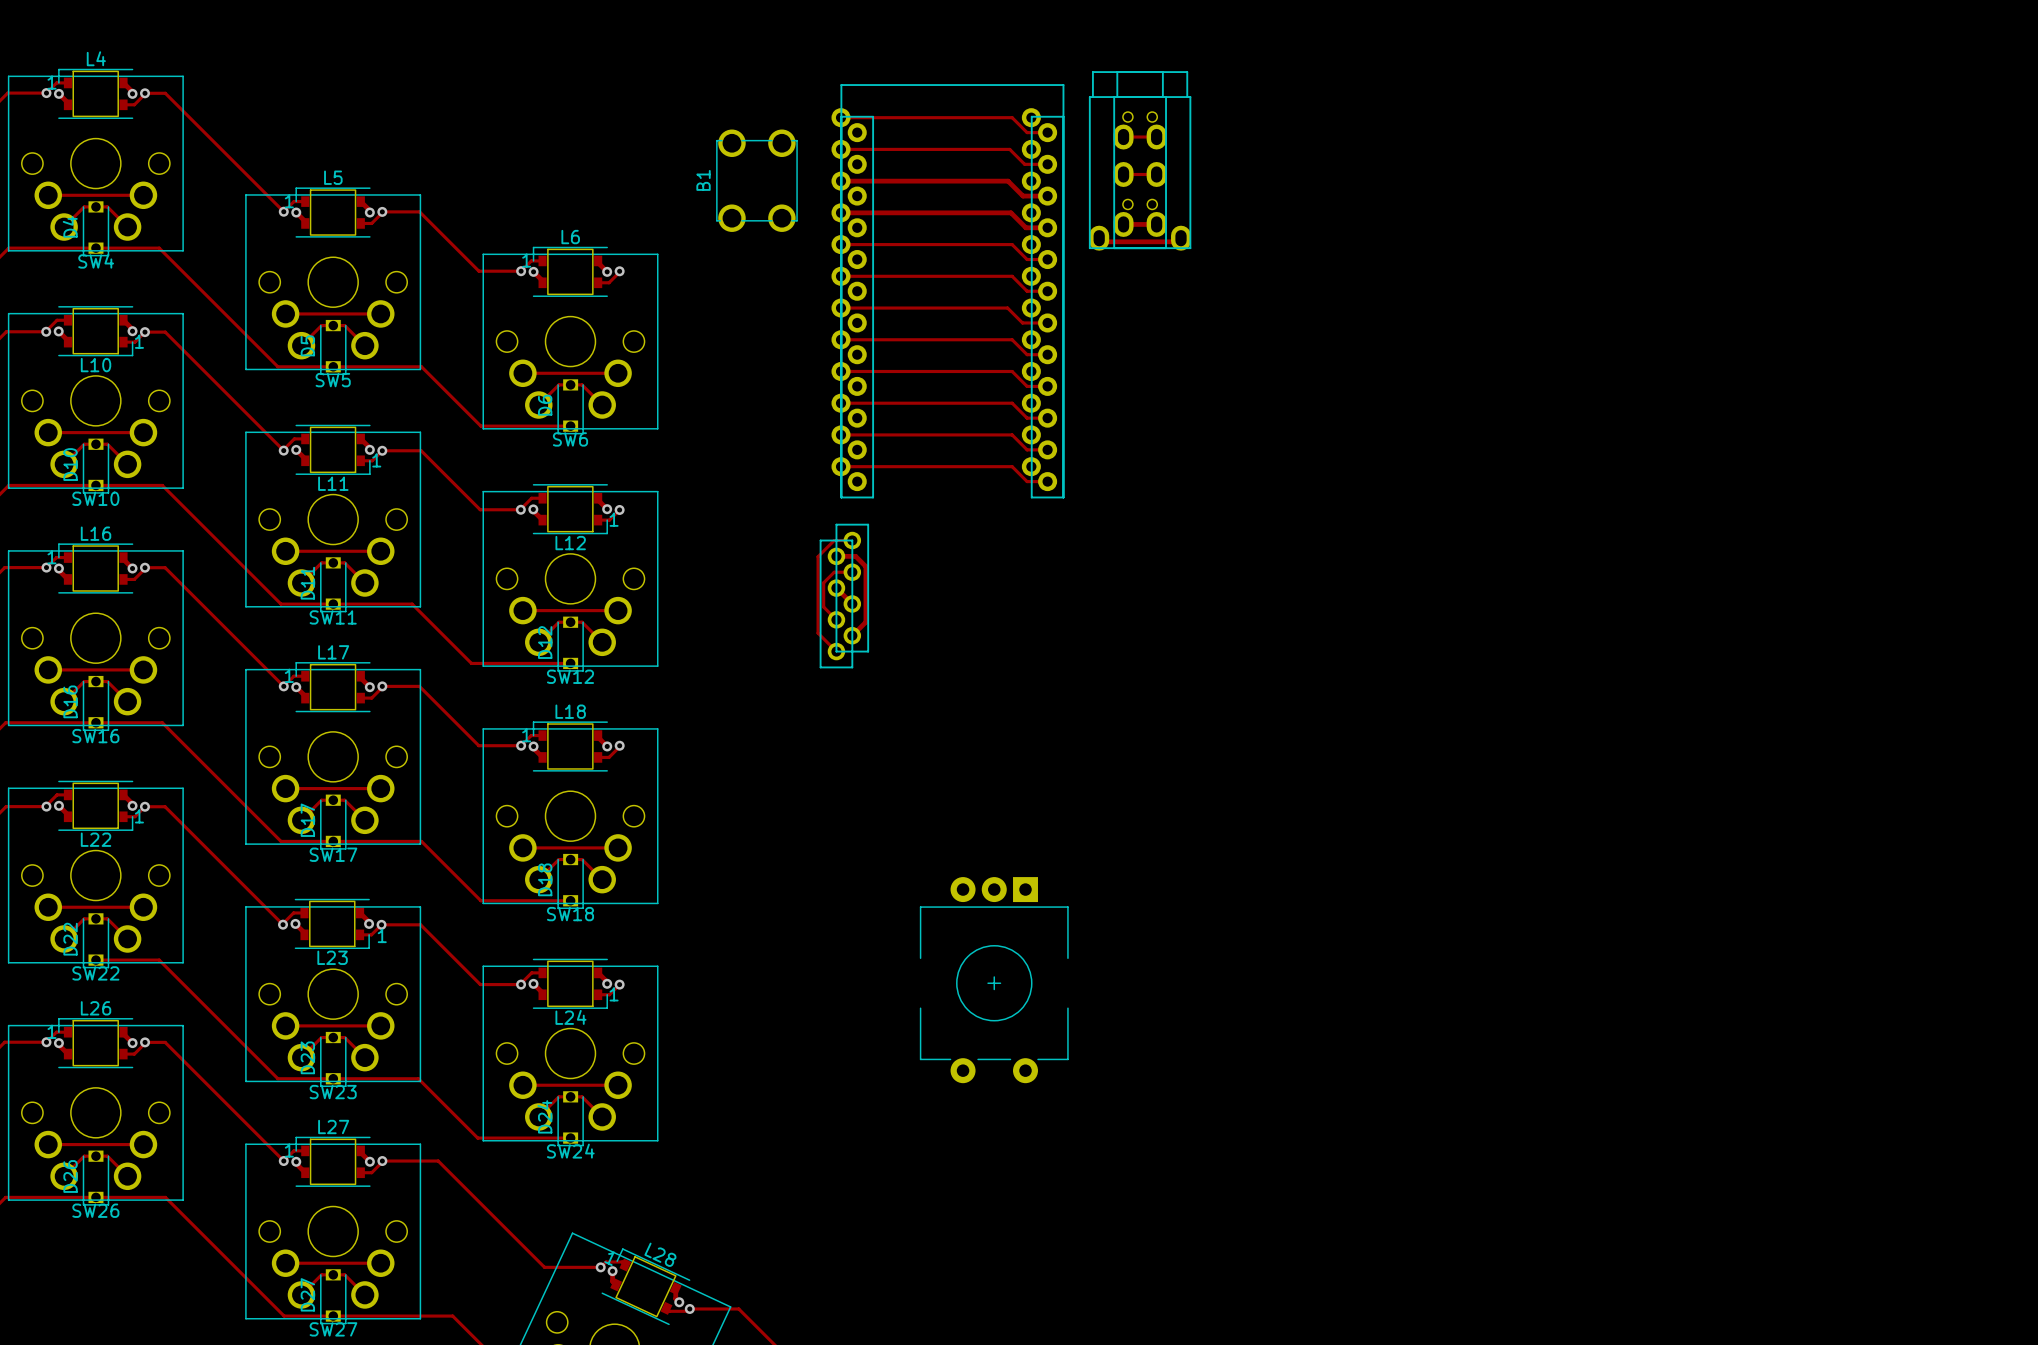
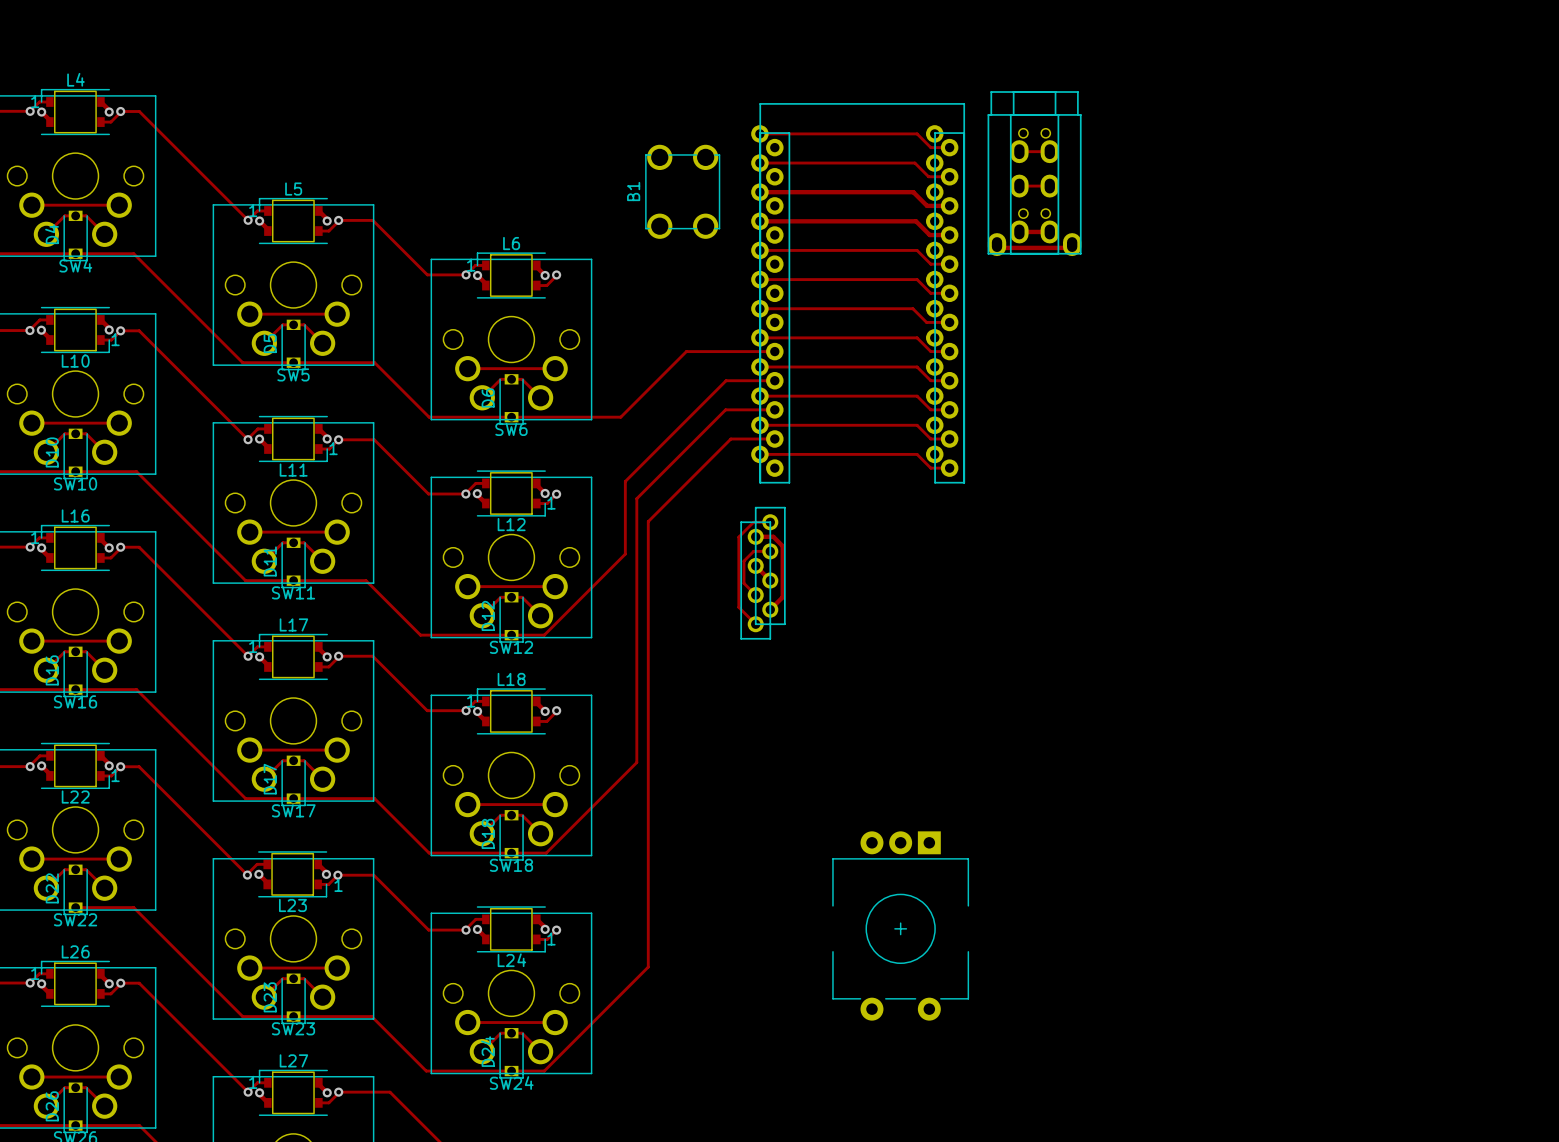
track: none -> (774, 351) (686, 351) (620, 417) (511, 417)
track: none -> (774, 380) (726, 380) (625, 481) (625, 554) (544, 635) (511, 635)
track: none -> (774, 409) (725, 409) (636, 498) (636, 762) (546, 853) (511, 853)
track: none -> (774, 438) (730, 438) (648, 521) (648, 967) (544, 1071) (511, 1071)

